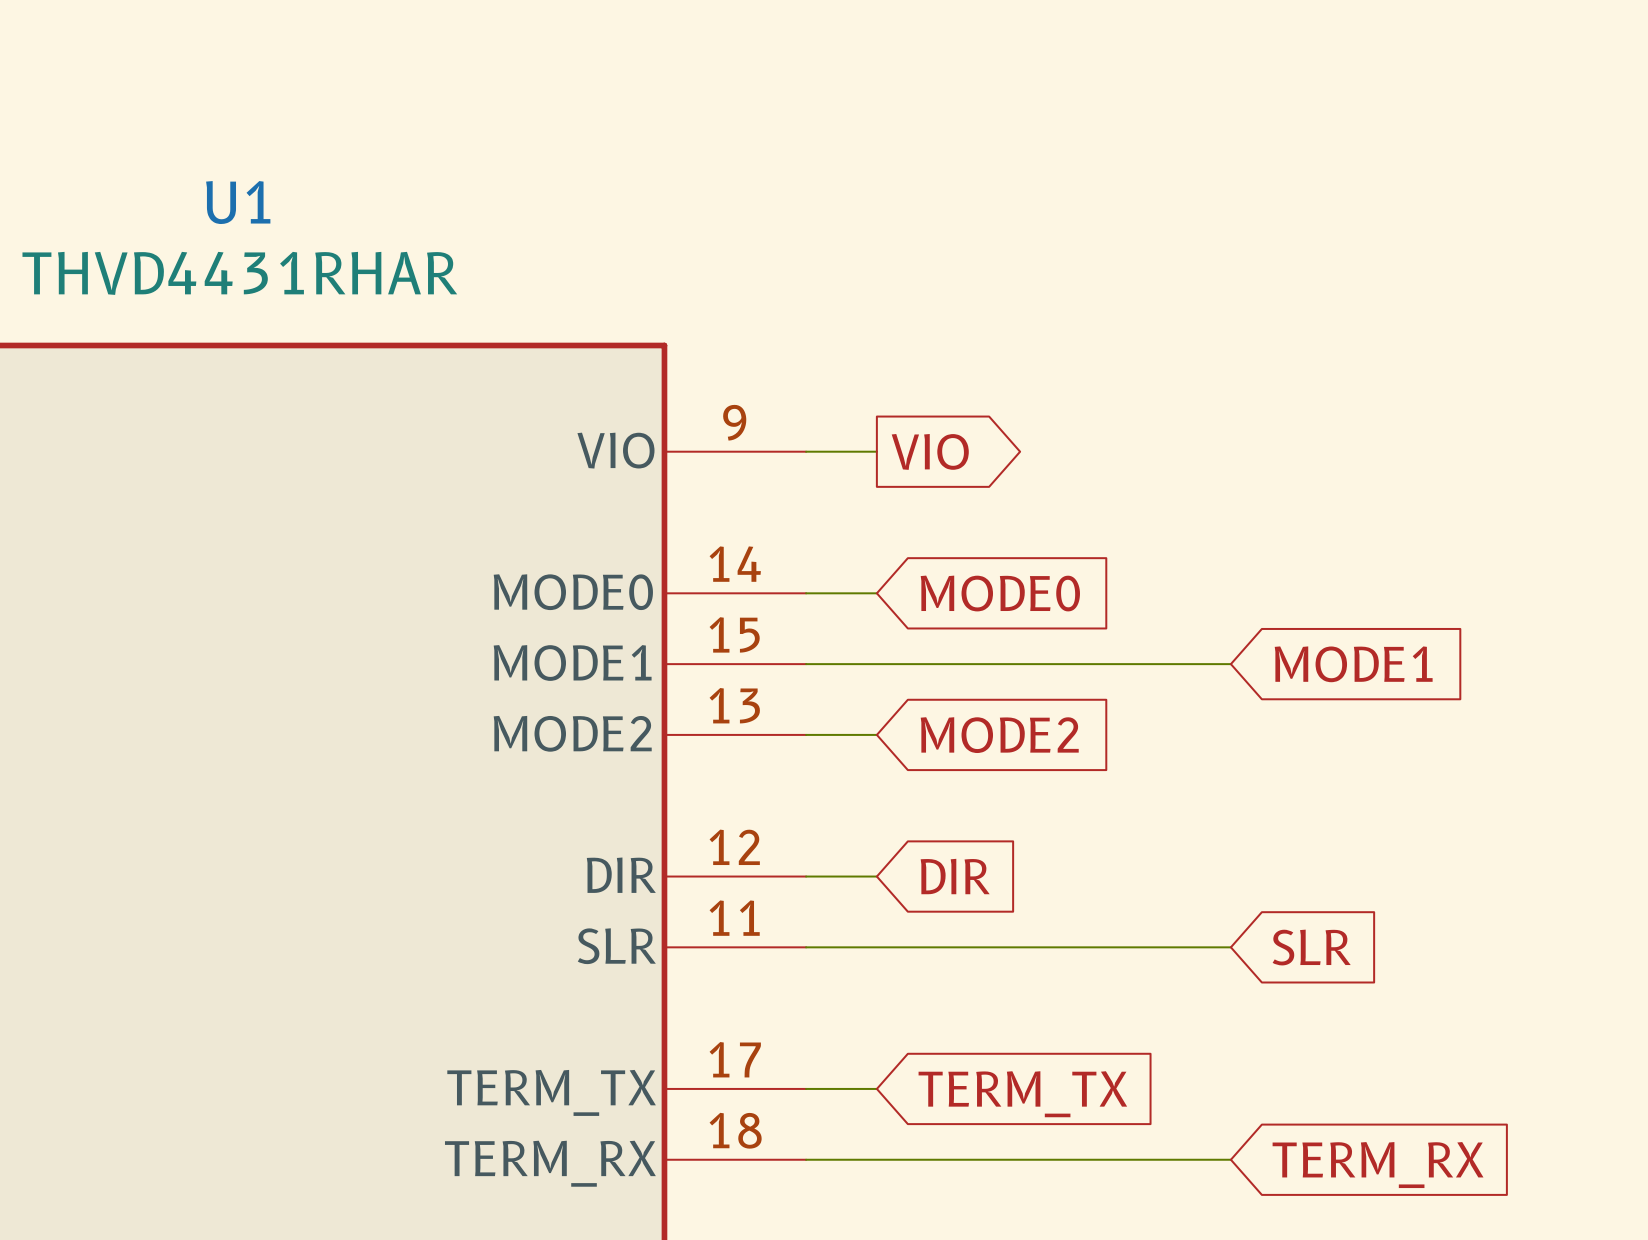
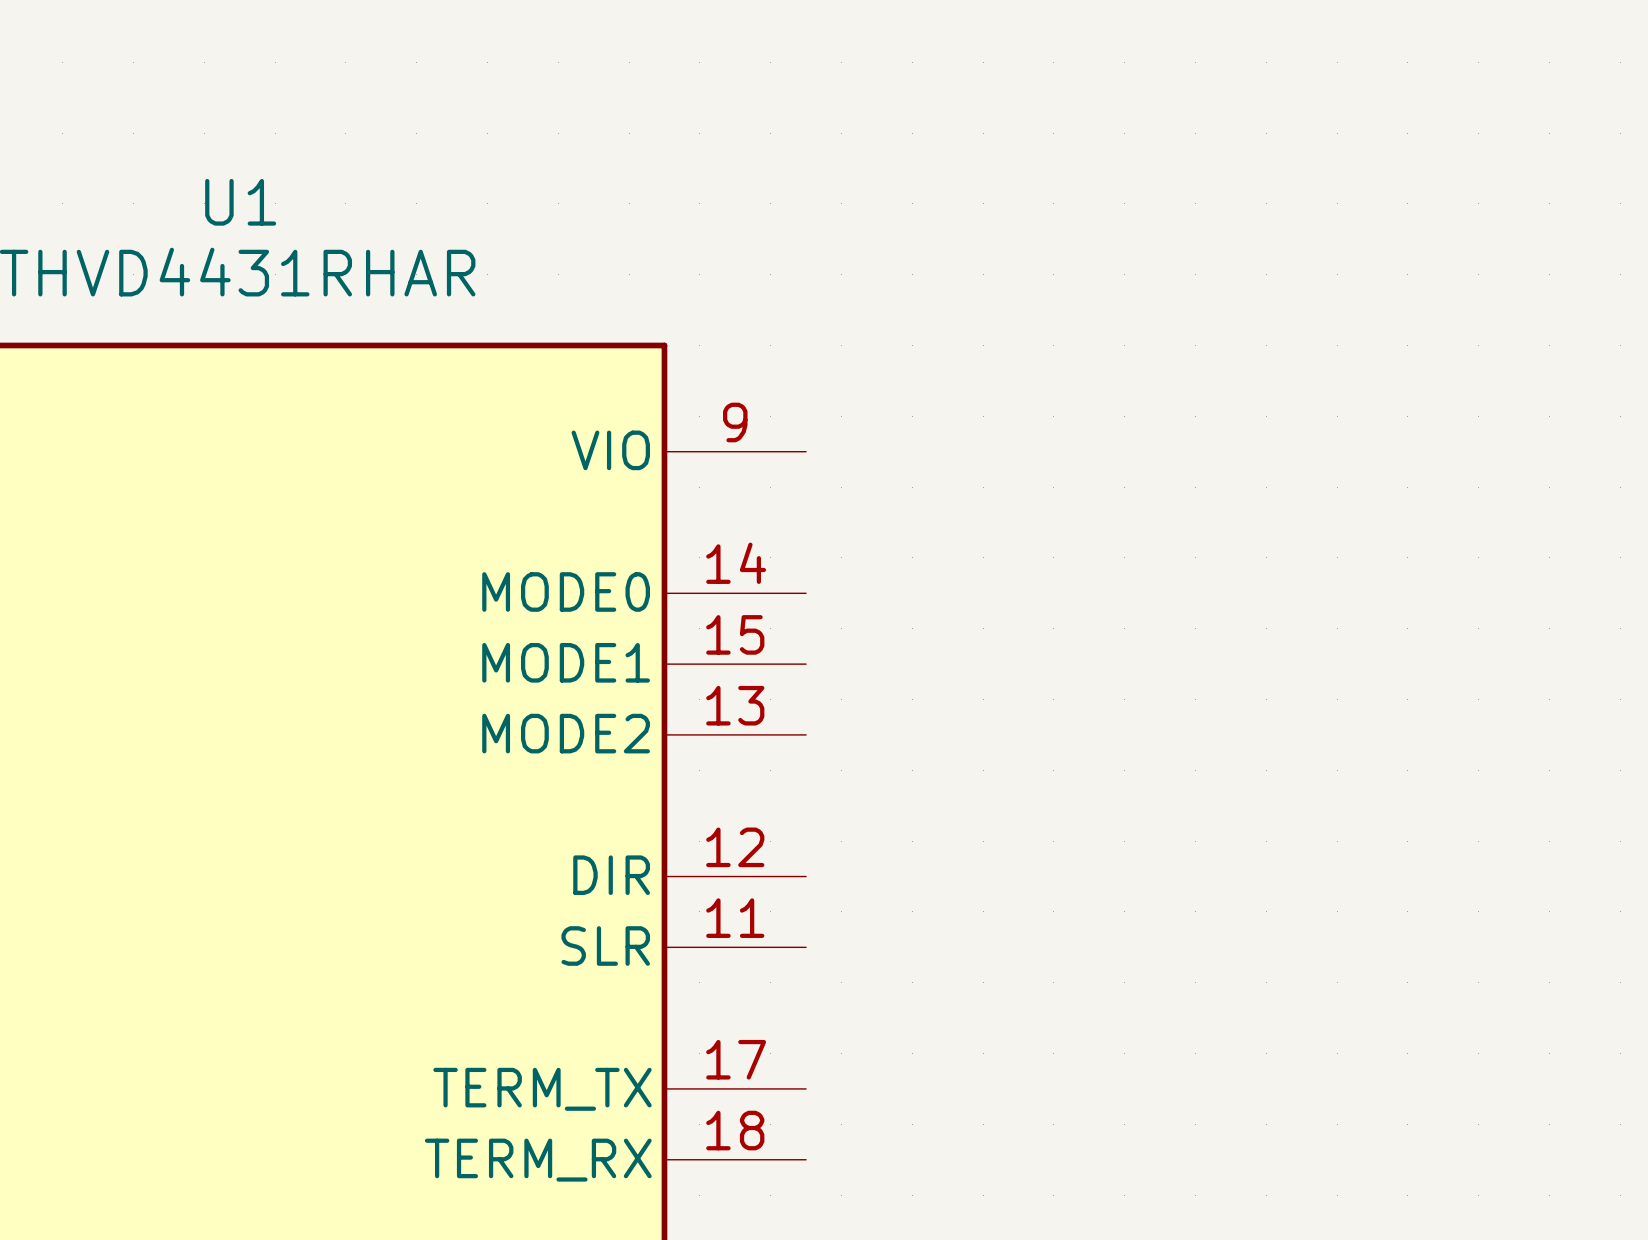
wire: (806, 451) (876, 451) -> none
global label: VIO (930, 451) -> none
wire: (806, 593) (876, 593) -> none
global label: MODE0 (1000, 593) -> none
wire: (806, 664) (1230, 664) -> none
global label: MODE1 (1353, 664) -> none
wire: (806, 734) (876, 734) -> none
global label: MODE2 (999, 735) -> none
wire: (806, 876) (876, 876) -> none
global label: DIR (955, 876) -> none
wire: (806, 947) (1230, 947) -> none
global label: SLR (1311, 947) -> none
wire: (806, 1088) (876, 1088) -> none
global label: TERM_TX (1022, 1094) -> none
wire: (806, 1159) (1230, 1159) -> none
global label: TERM_RX (1378, 1165) -> none

